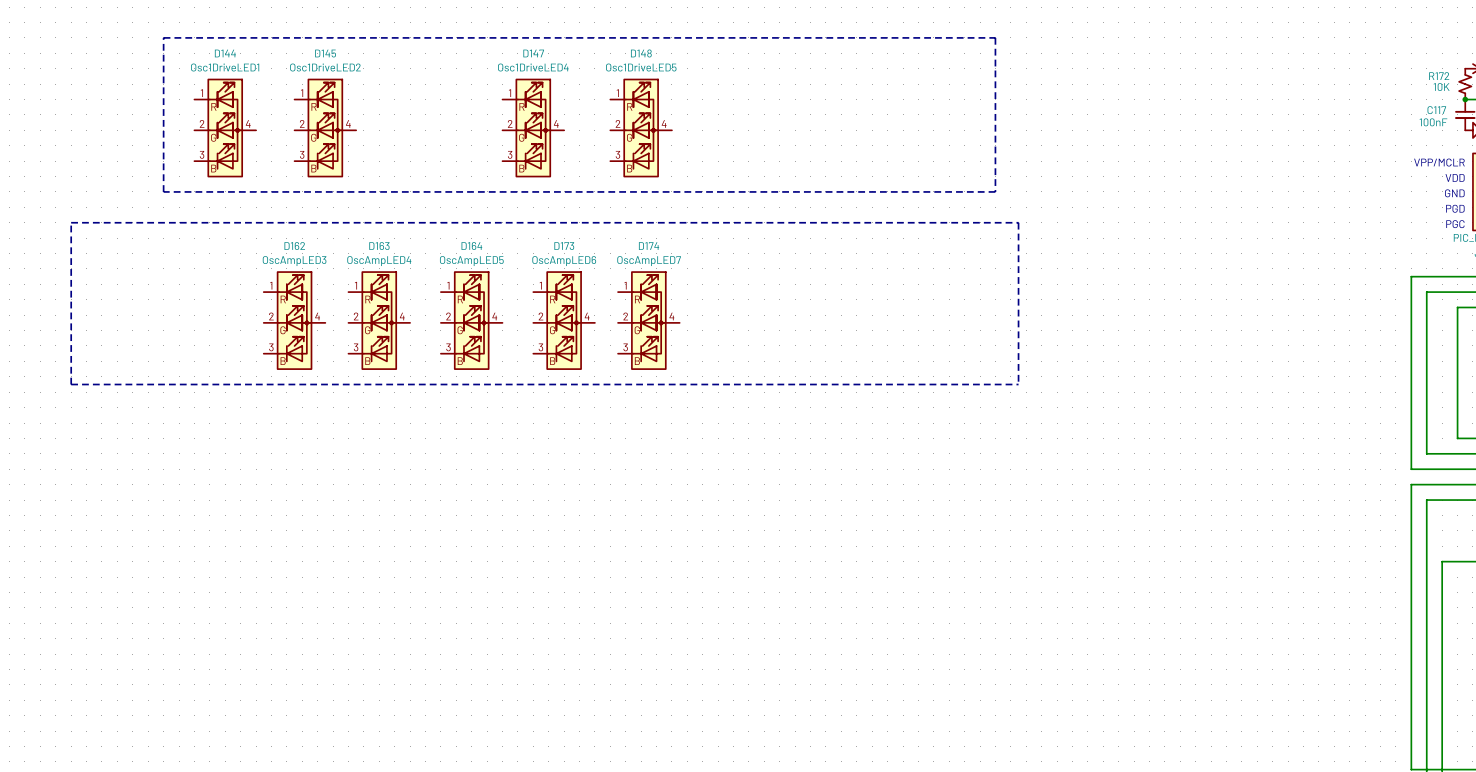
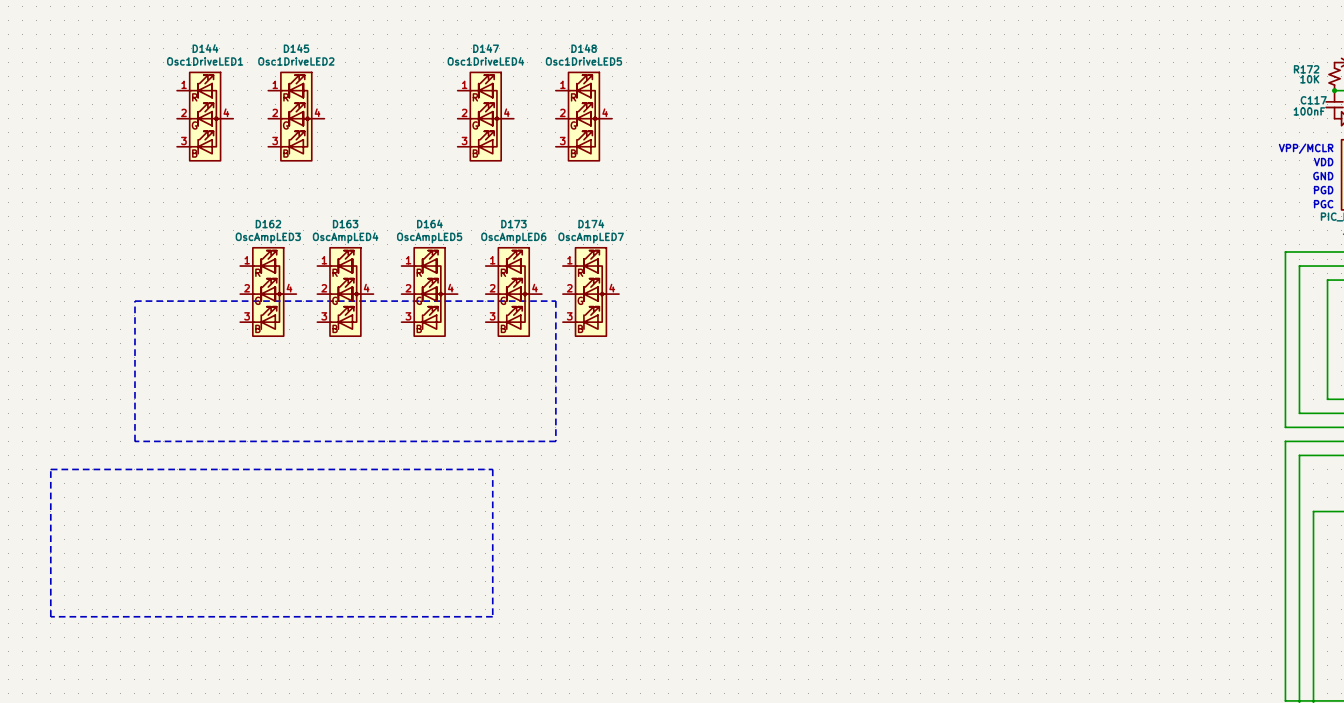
line: (163, 37) (163, 191) (995, 191) (995, 37) (163, 37) -> none
line: (71, 222) (1018, 222) (1018, 384) (71, 384) (71, 222) -> none
line: none -> (134, 301) (134, 441) (555, 441) (555, 301) (134, 301)
line: none -> (50, 469) (492, 469) (492, 616) (50, 616) (50, 469)

